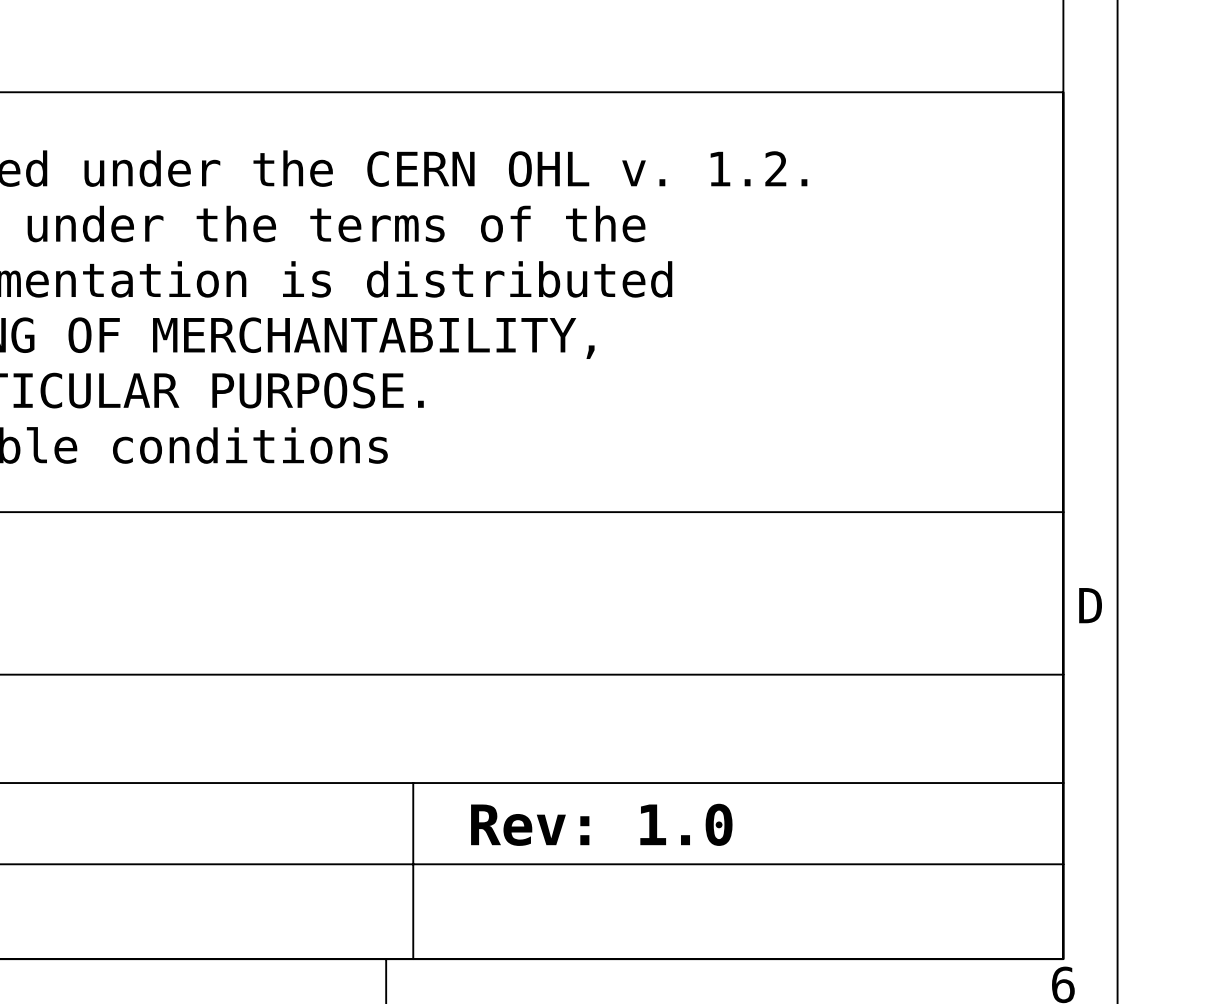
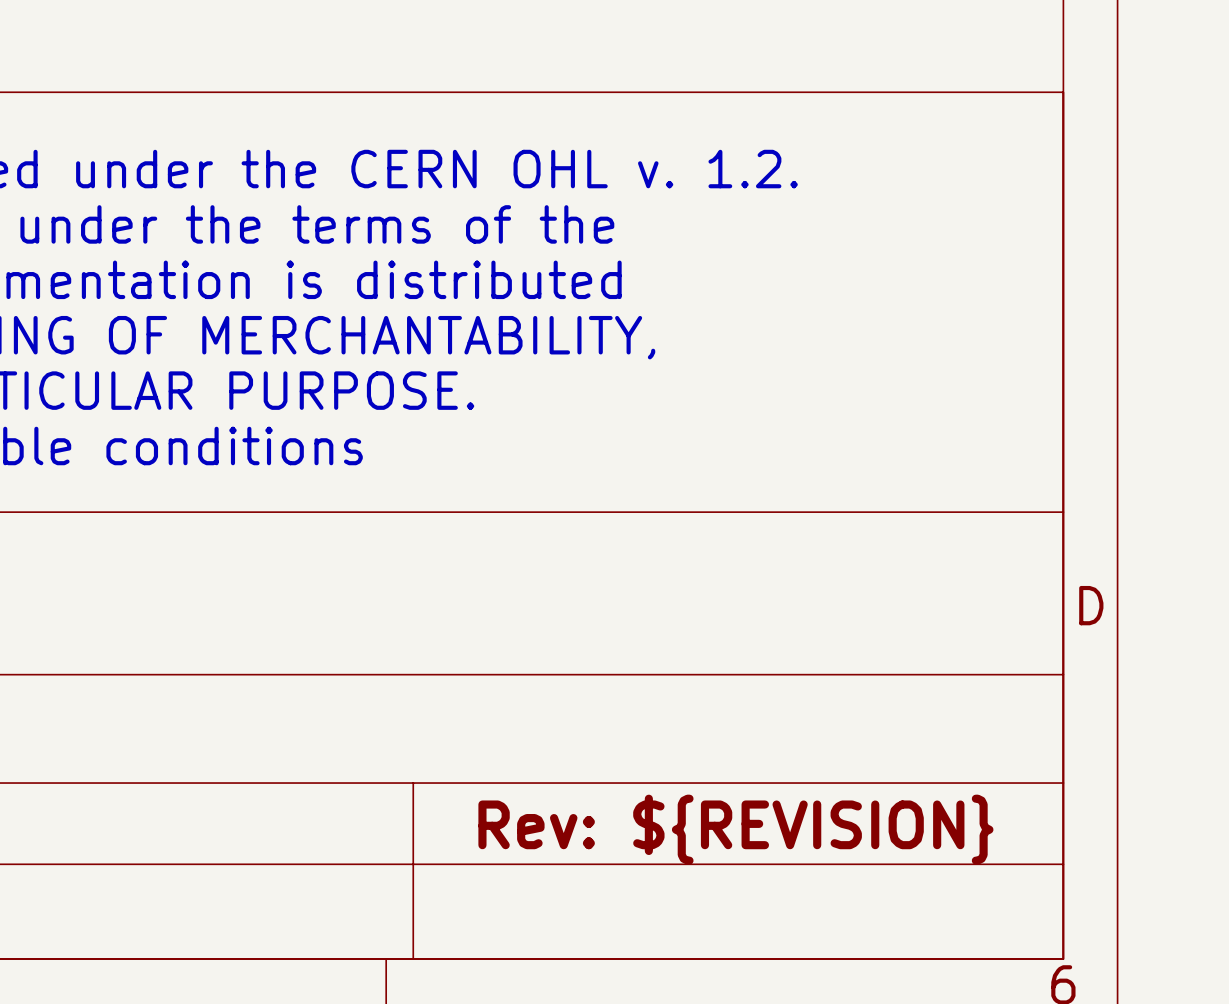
title block: Rev: 1.0 (601, 824) -> Rev: ${REVISION} (735, 829)

